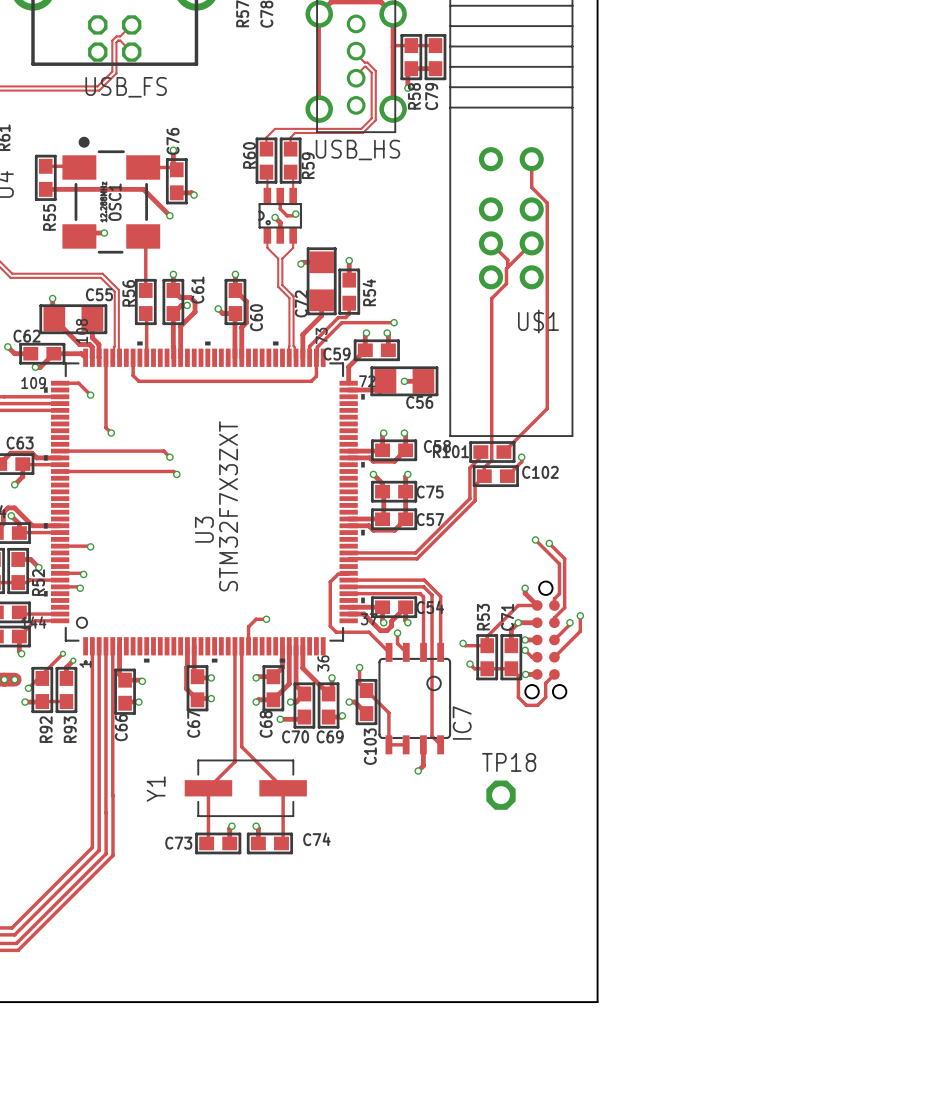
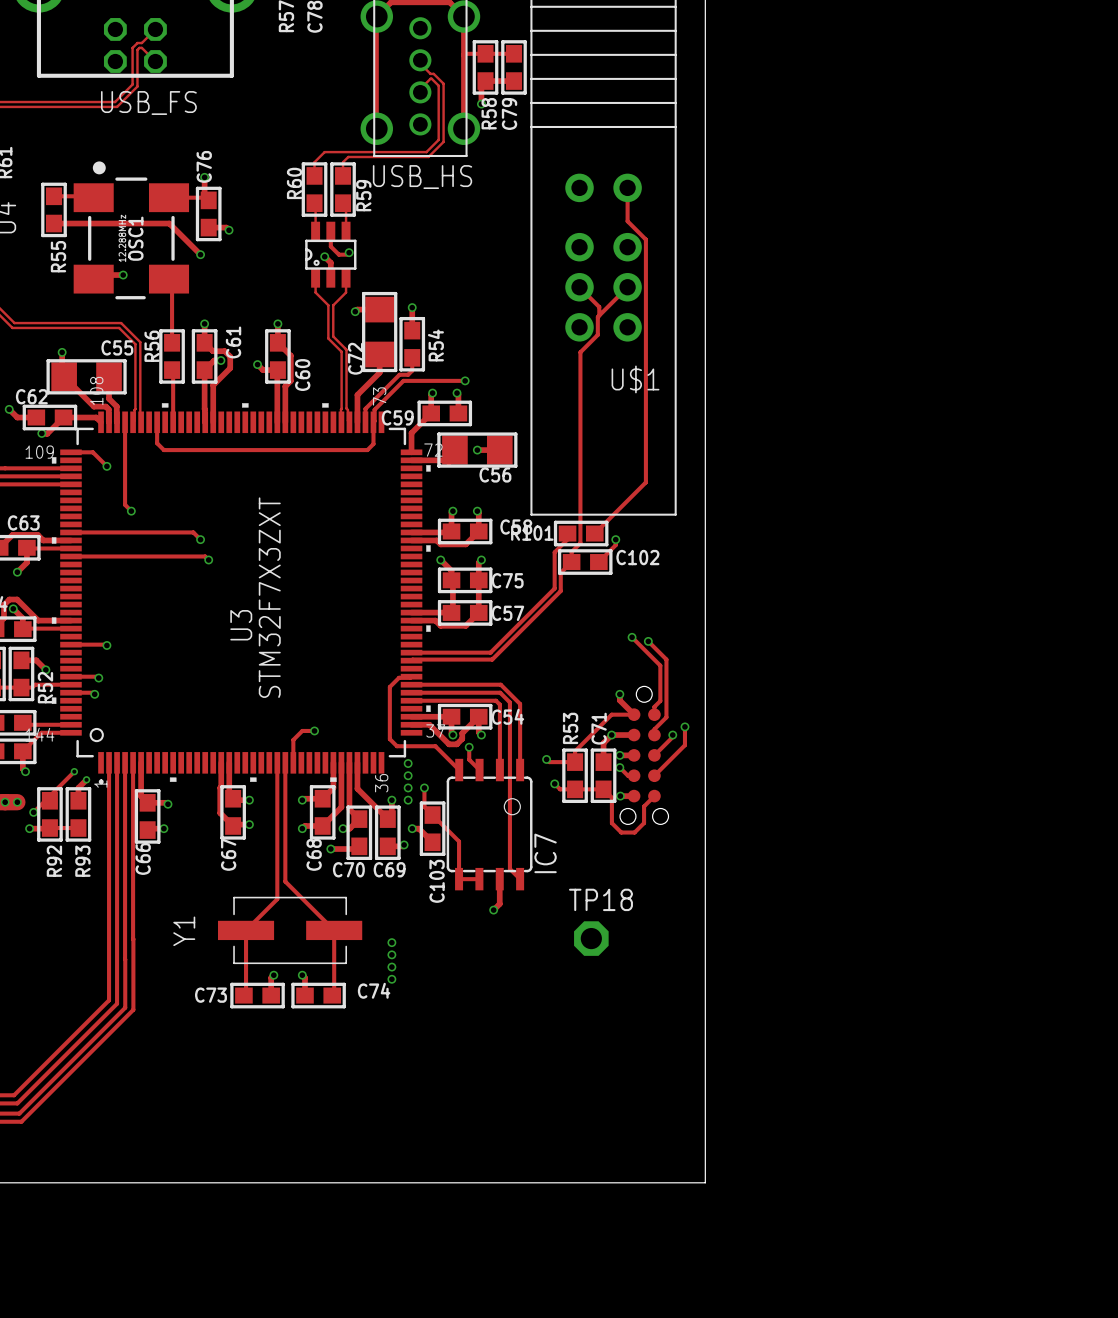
via: none -> (408, 763)
via: none -> (408, 775)
via: none -> (408, 787)
via: none -> (408, 800)
via: none -> (391, 942)
via: none -> (391, 954)
via: none -> (391, 967)
via: none -> (391, 979)

